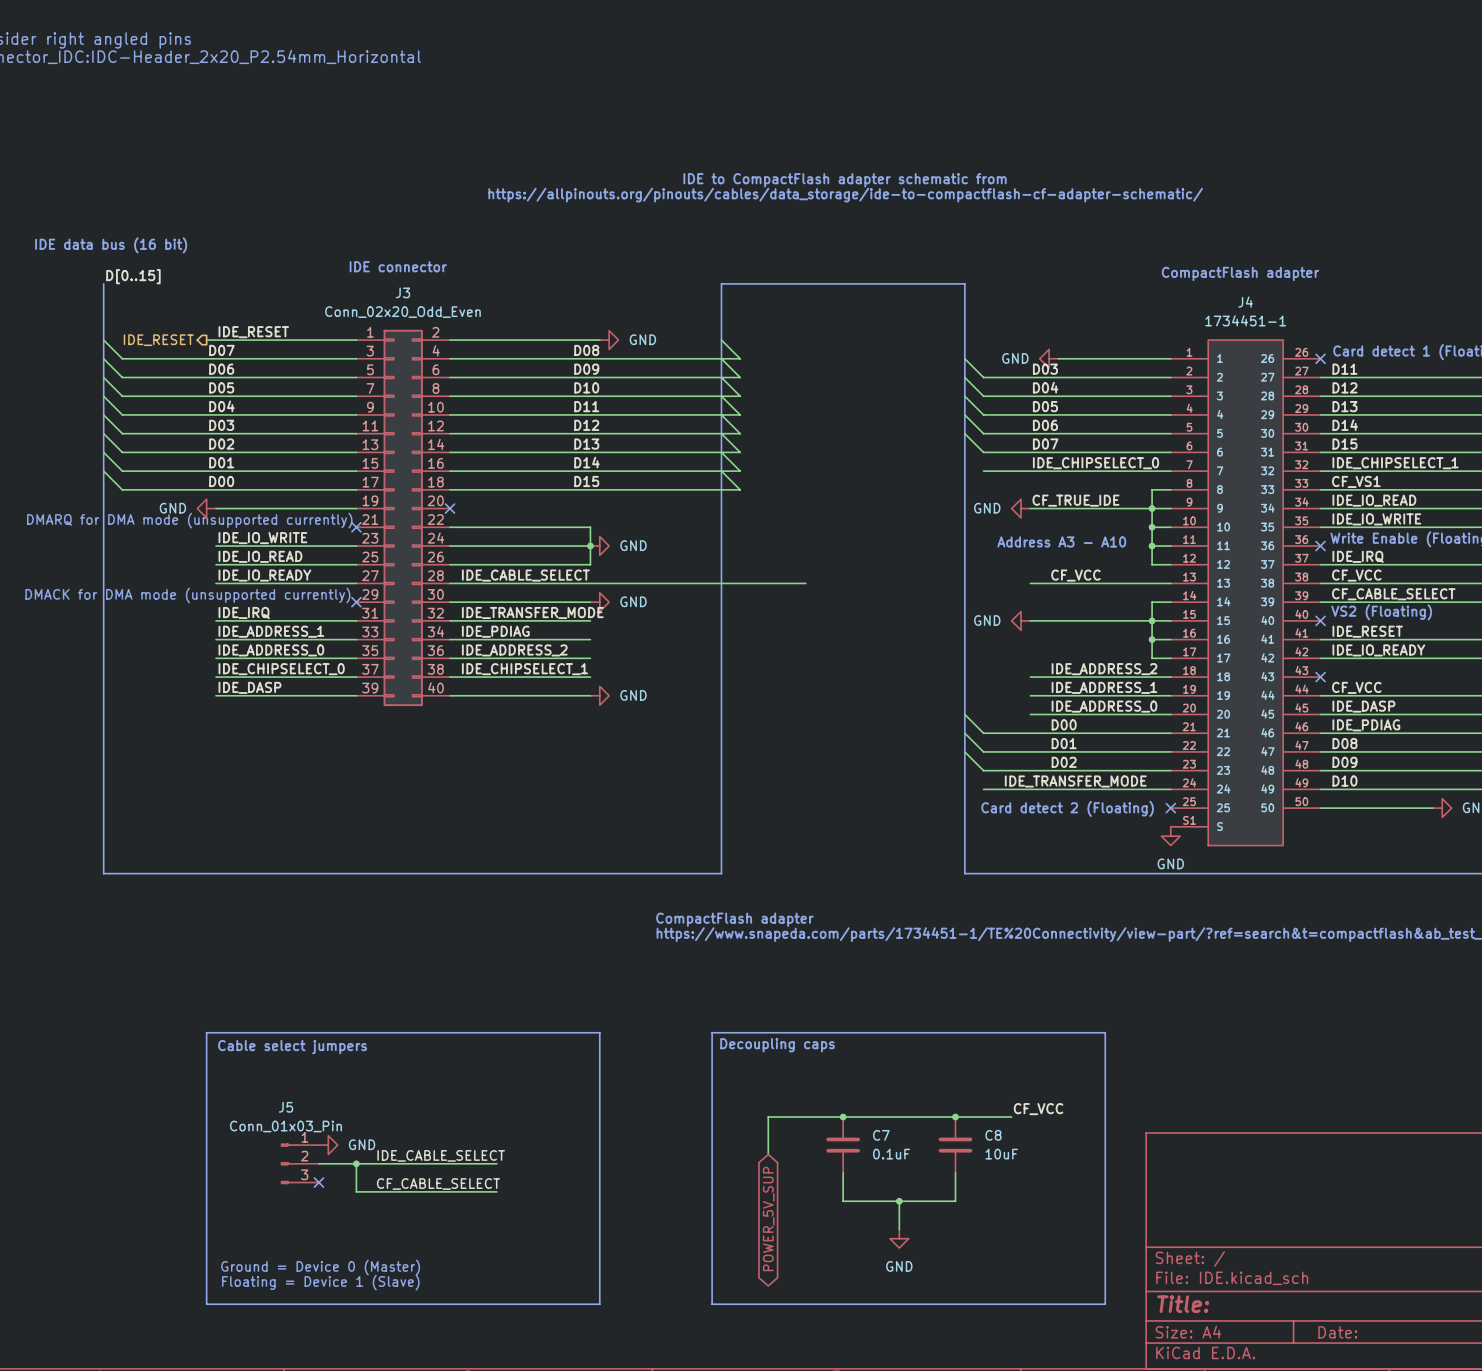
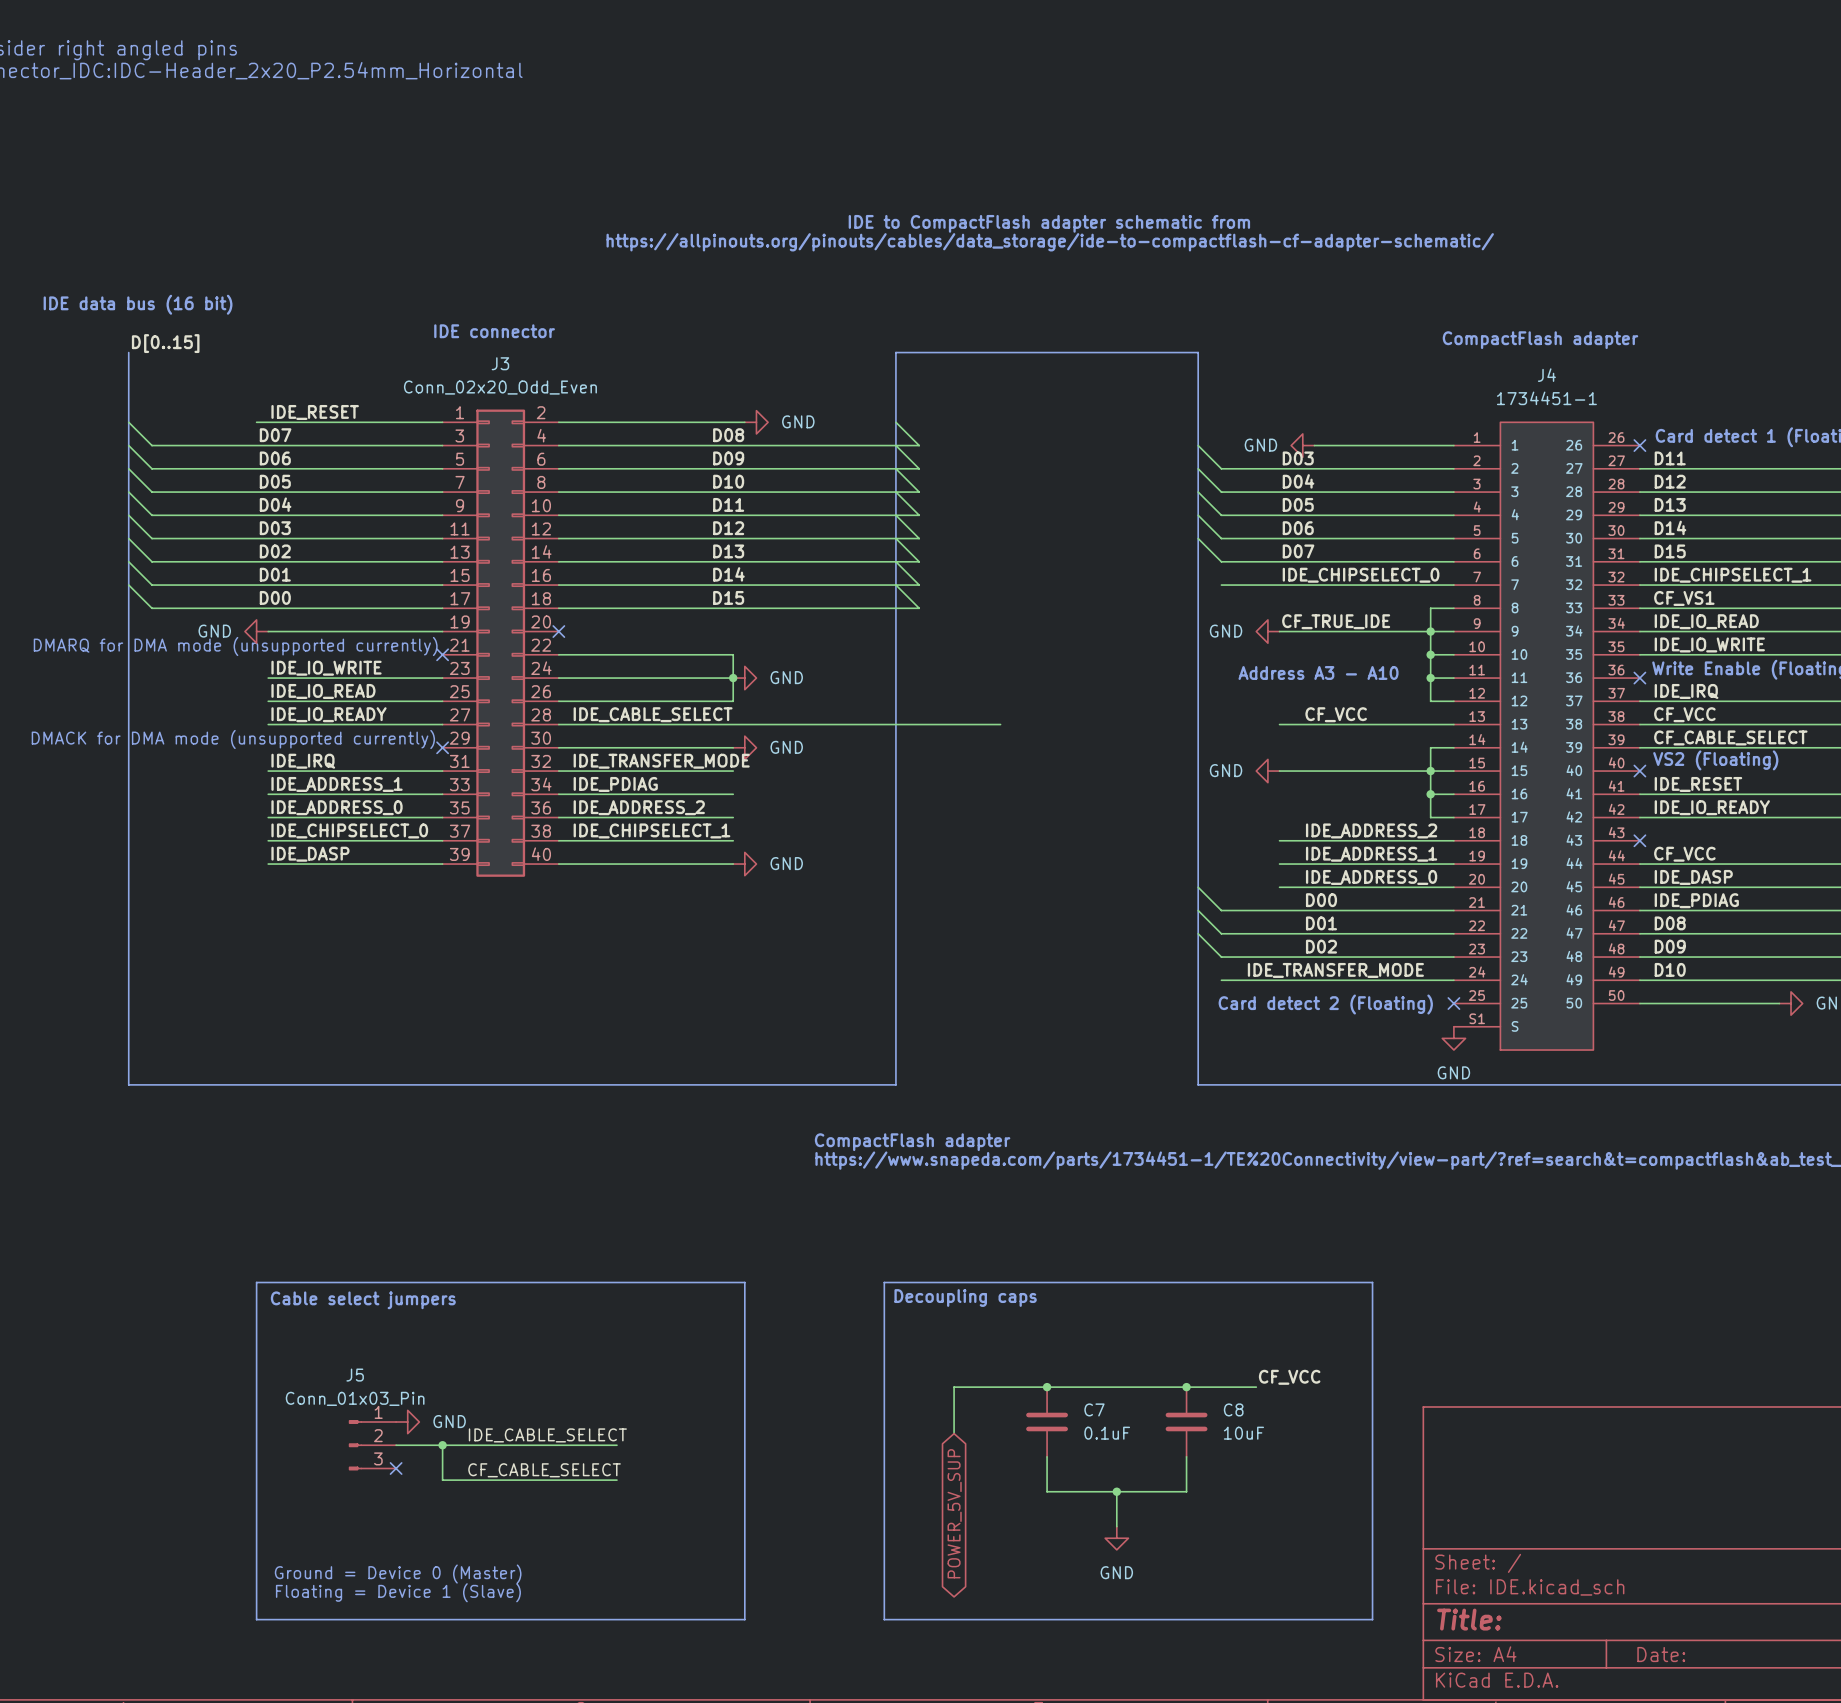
hierarchical label: IDE_RESET (158, 340) -> none

